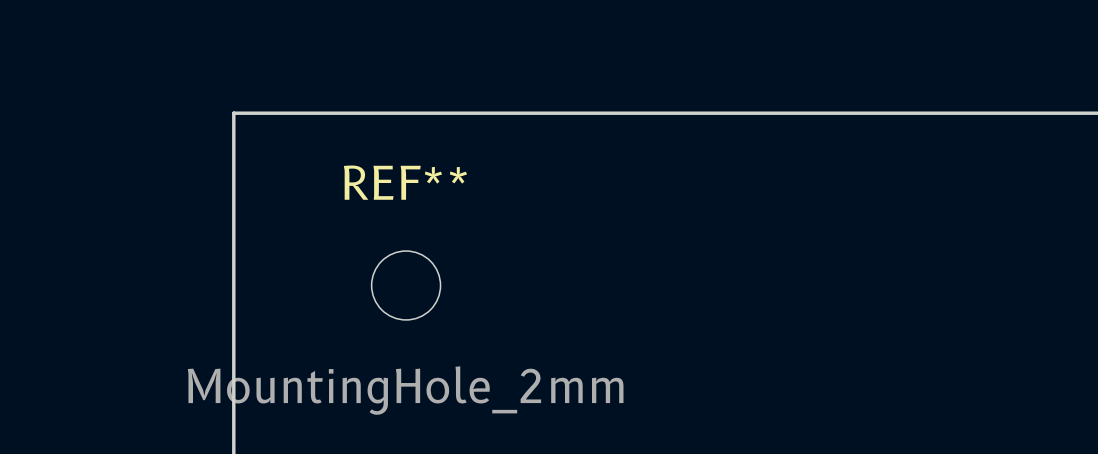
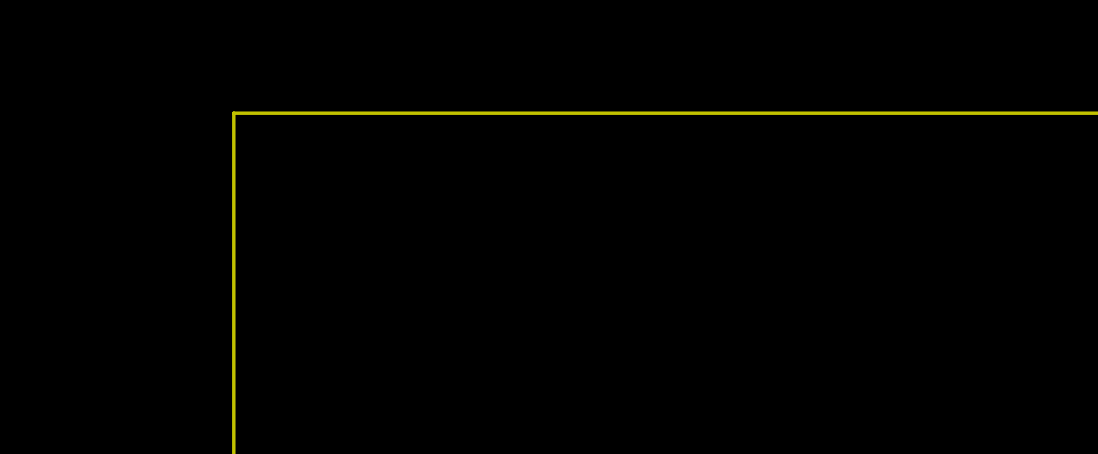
REF**: MountingHole_2mm (406, 285) -> none

